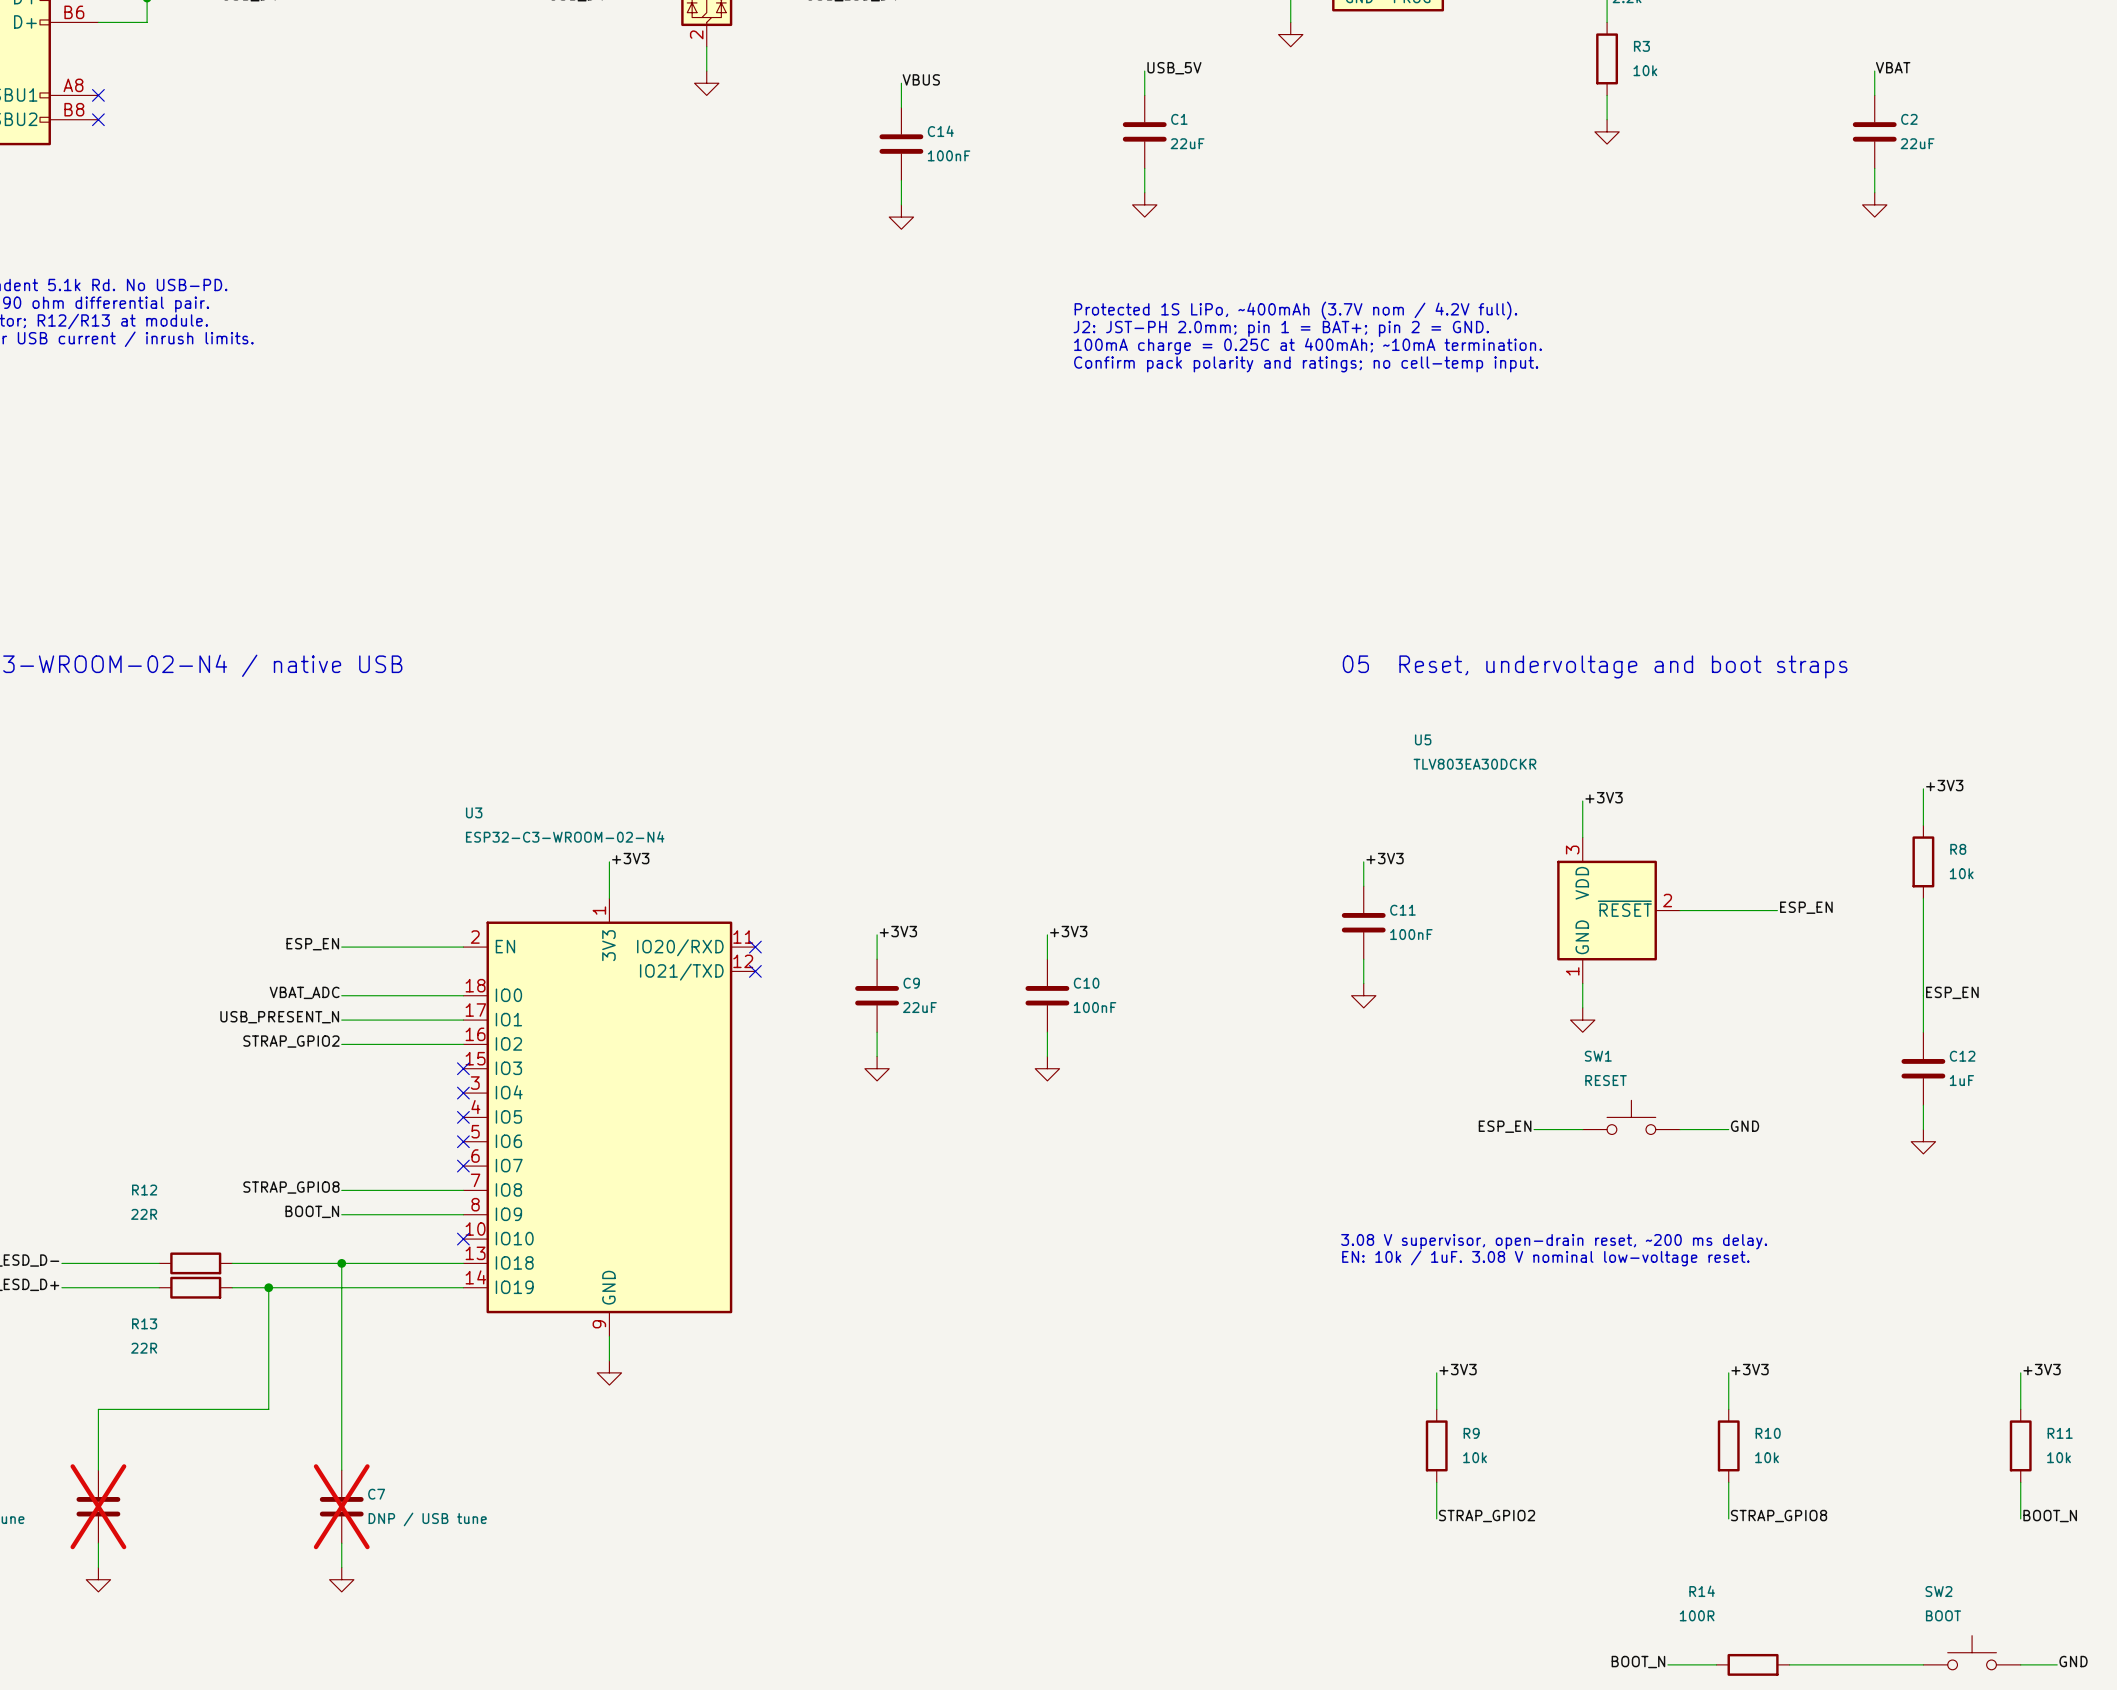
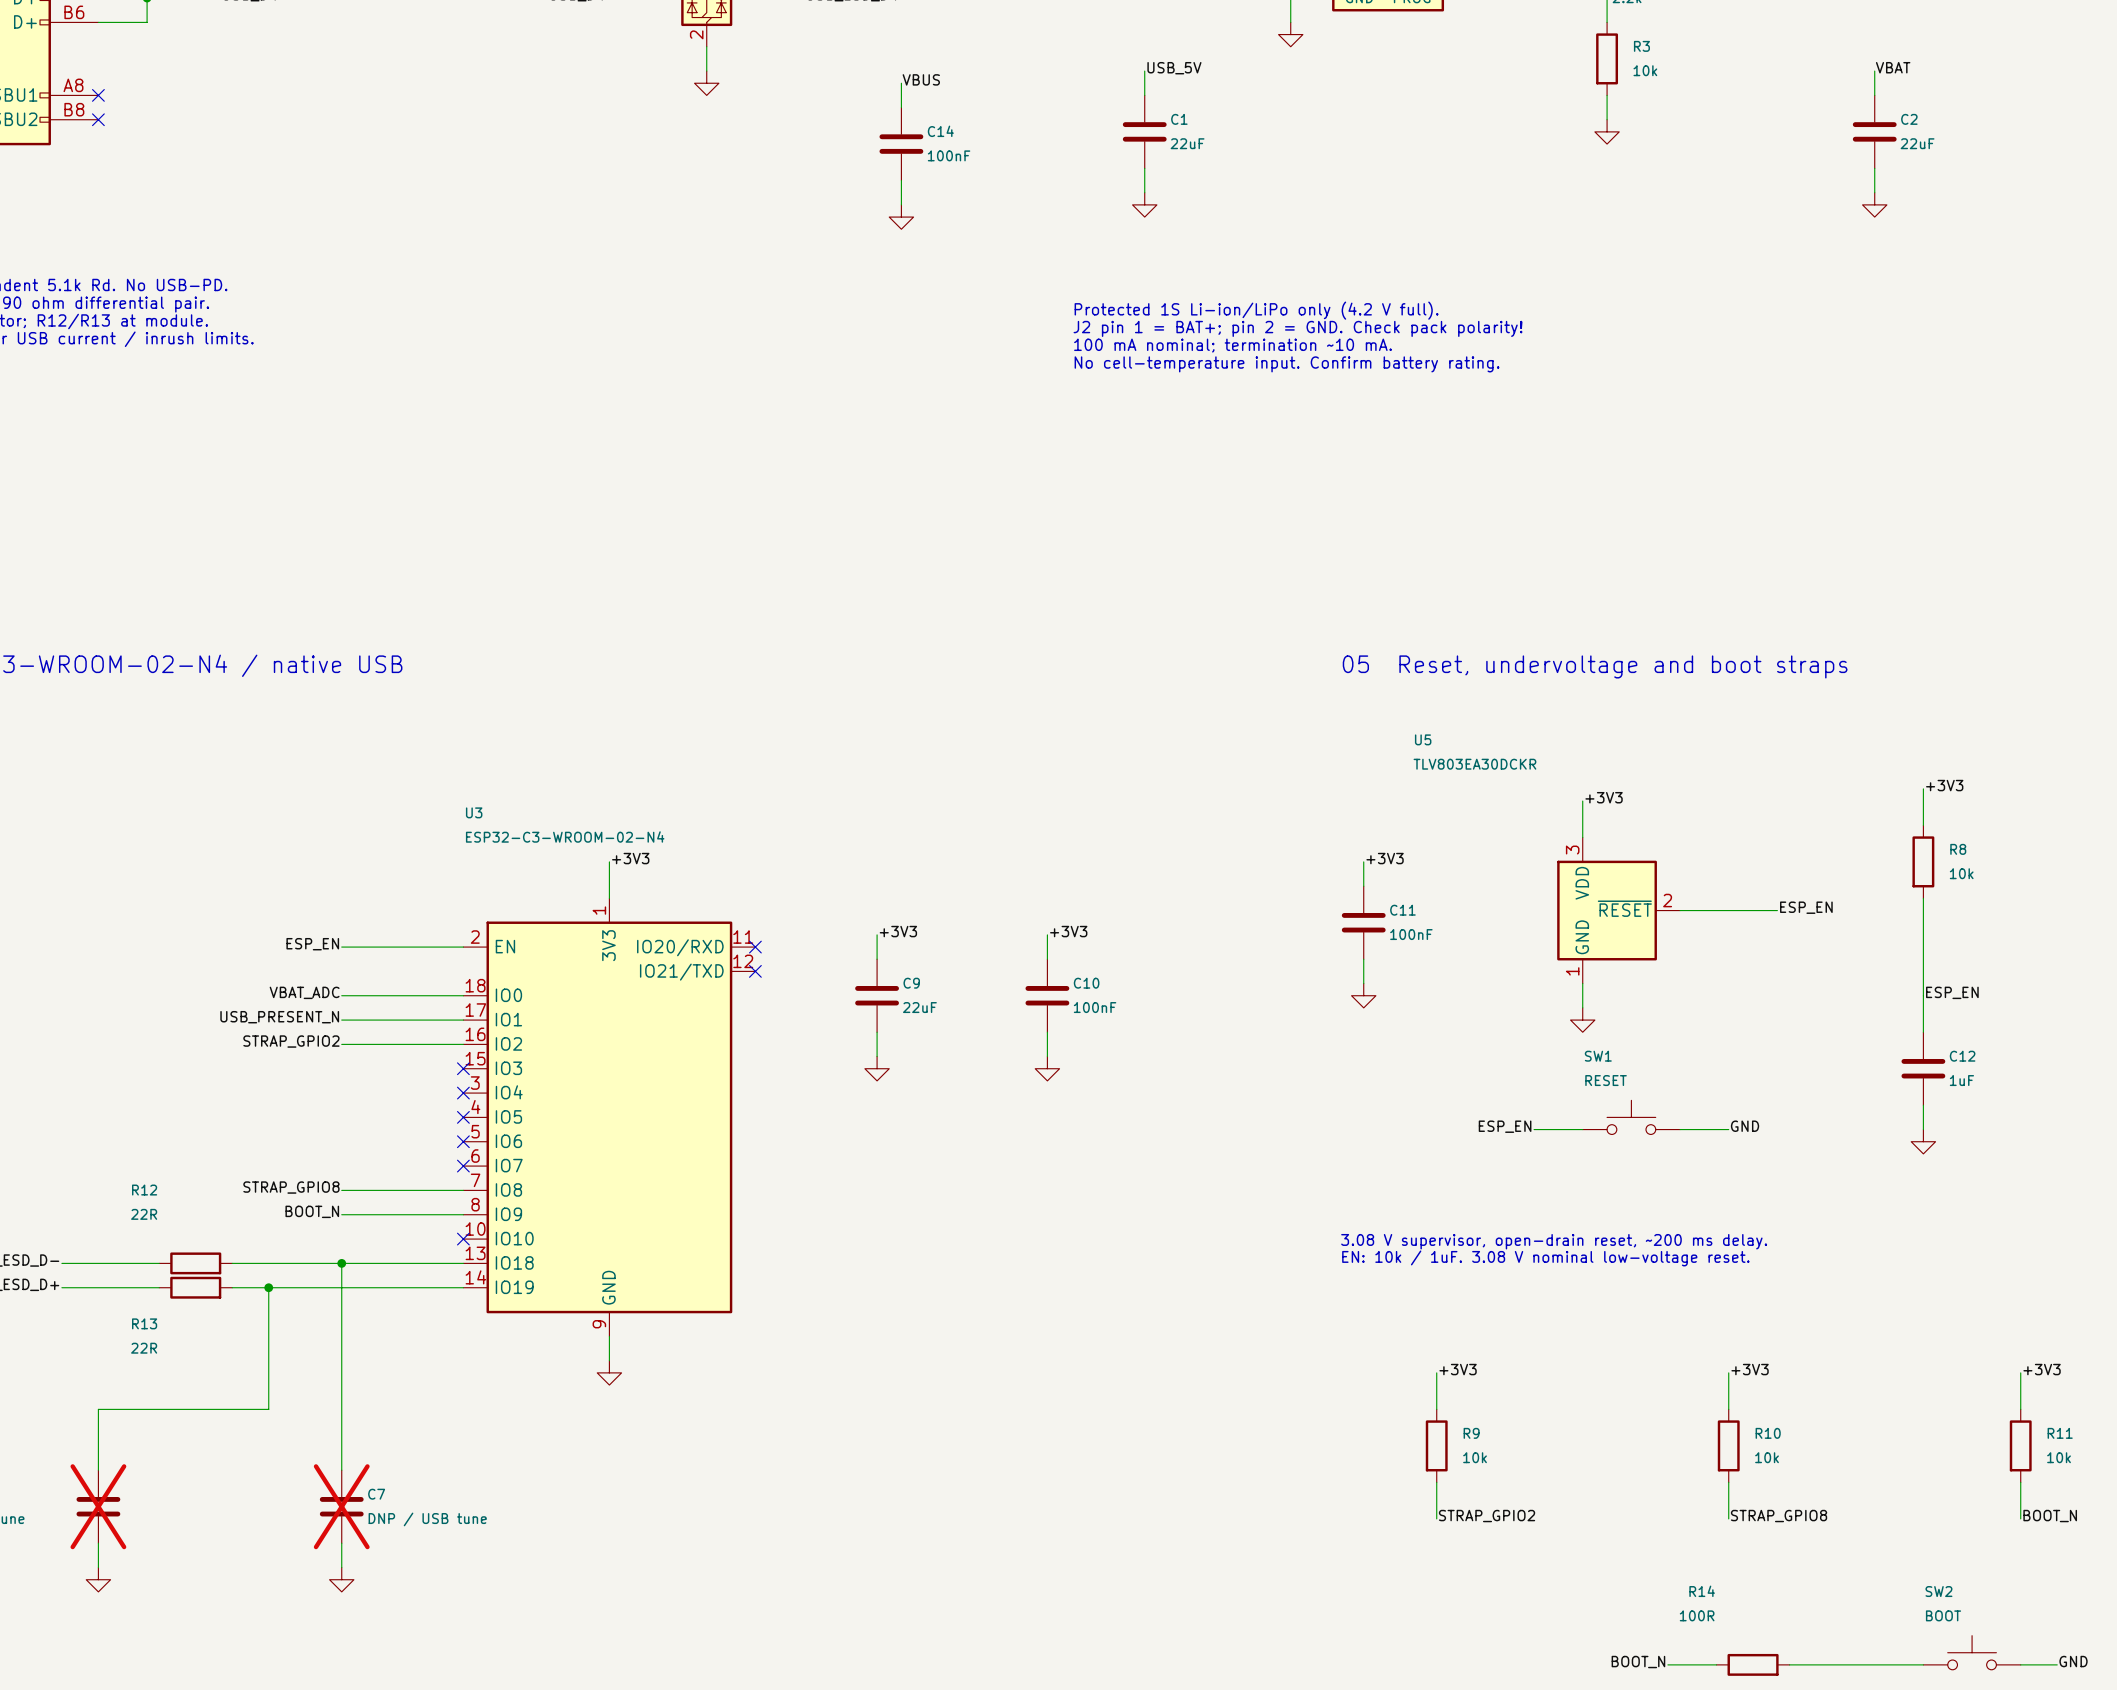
text: Protected 1S LiPo, ~400mAh (3.7V nom / 4.2V full). (1295, 310) -> Protected 1S Li-ion/LiPo only (4.2 V full). (1256, 310)
text: J2: JST-PH 2.0mm; pin 1 = BAT+; pin 2 = GND. (1281, 328) -> J2 pin 1 = BAT+; pin 2 = GND. Check pack polarity! (1298, 328)
text: 100mA charge = 0.25C at 400mAh; ~10mA termination. (1307, 346) -> 100 mA nominal; termination ~10 mA. (1232, 345)
text: Confirm pack polarity and ratings; no cell-temp input. (1306, 364) -> No cell-temperature input. Confirm battery rating. (1287, 364)

